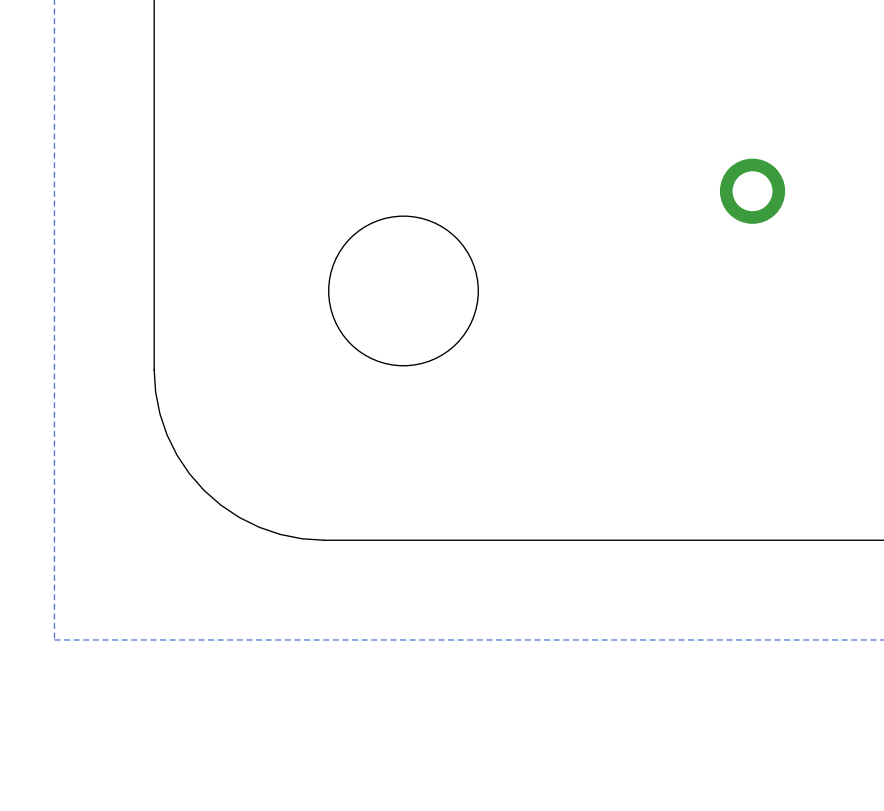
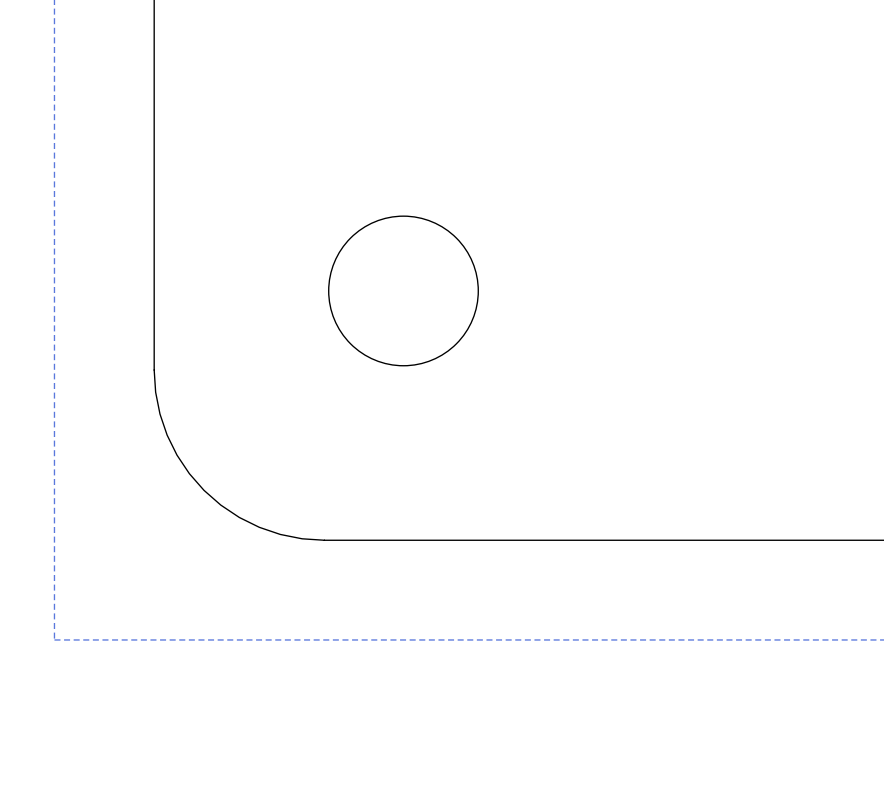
via: (752, 191) -> none

